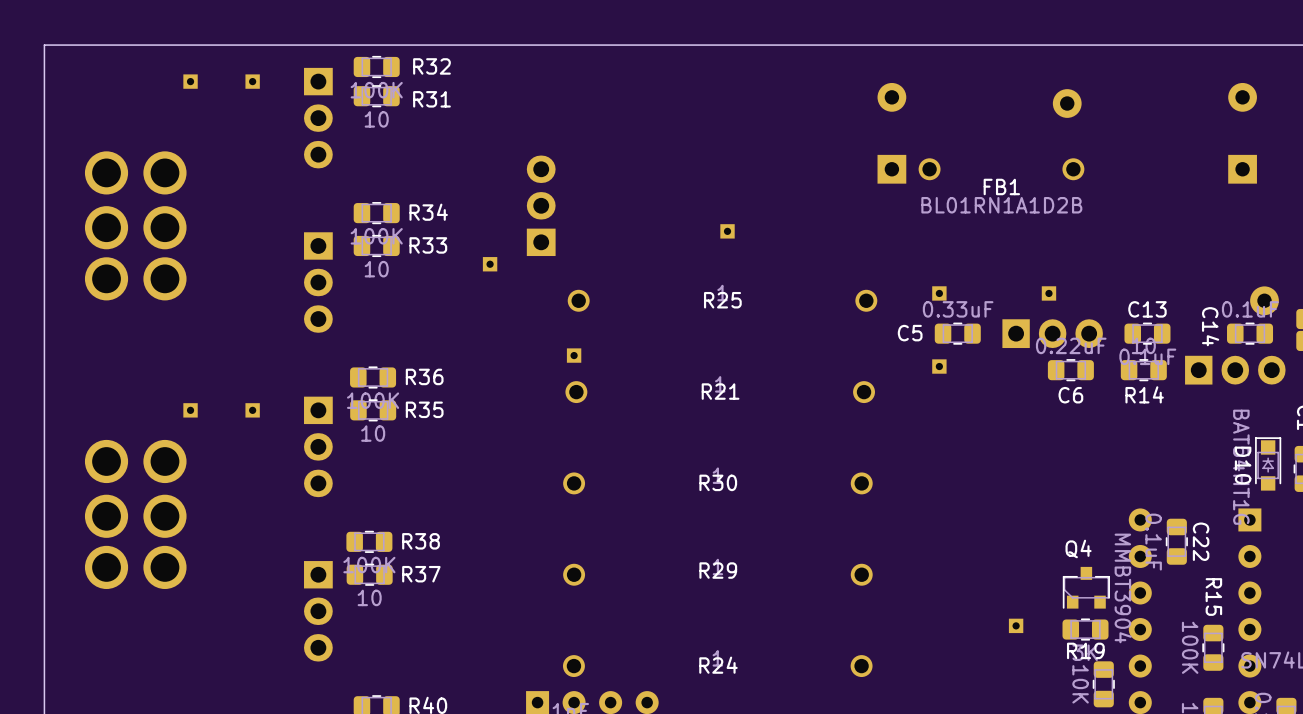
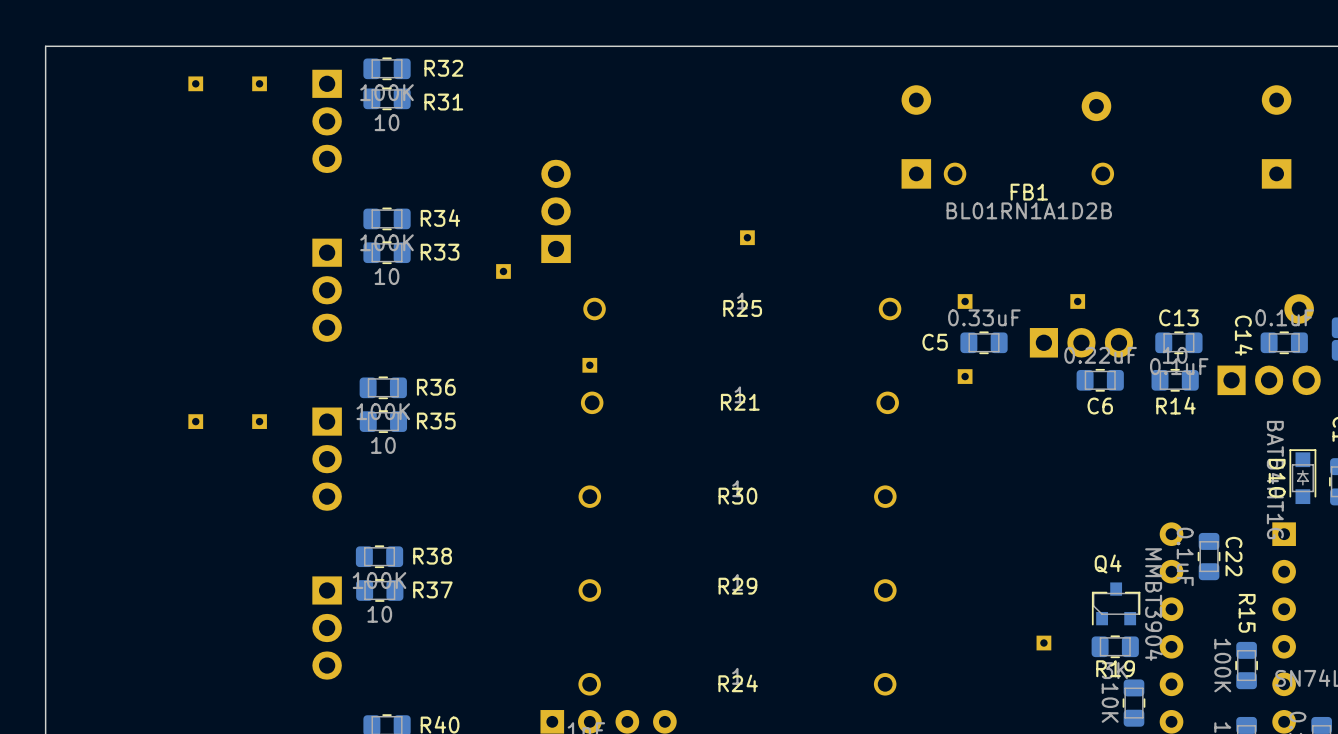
part: (106, 172) -> none
part: (164, 172) -> none
part: (106, 227) -> none
part: (164, 227) -> none
part: (106, 278) -> none
part: (164, 278) -> none
part: (106, 461) -> none
part: (164, 461) -> none
part: (106, 516) -> none
part: (164, 516) -> none
part: (106, 567) -> none
part: (164, 567) -> none

